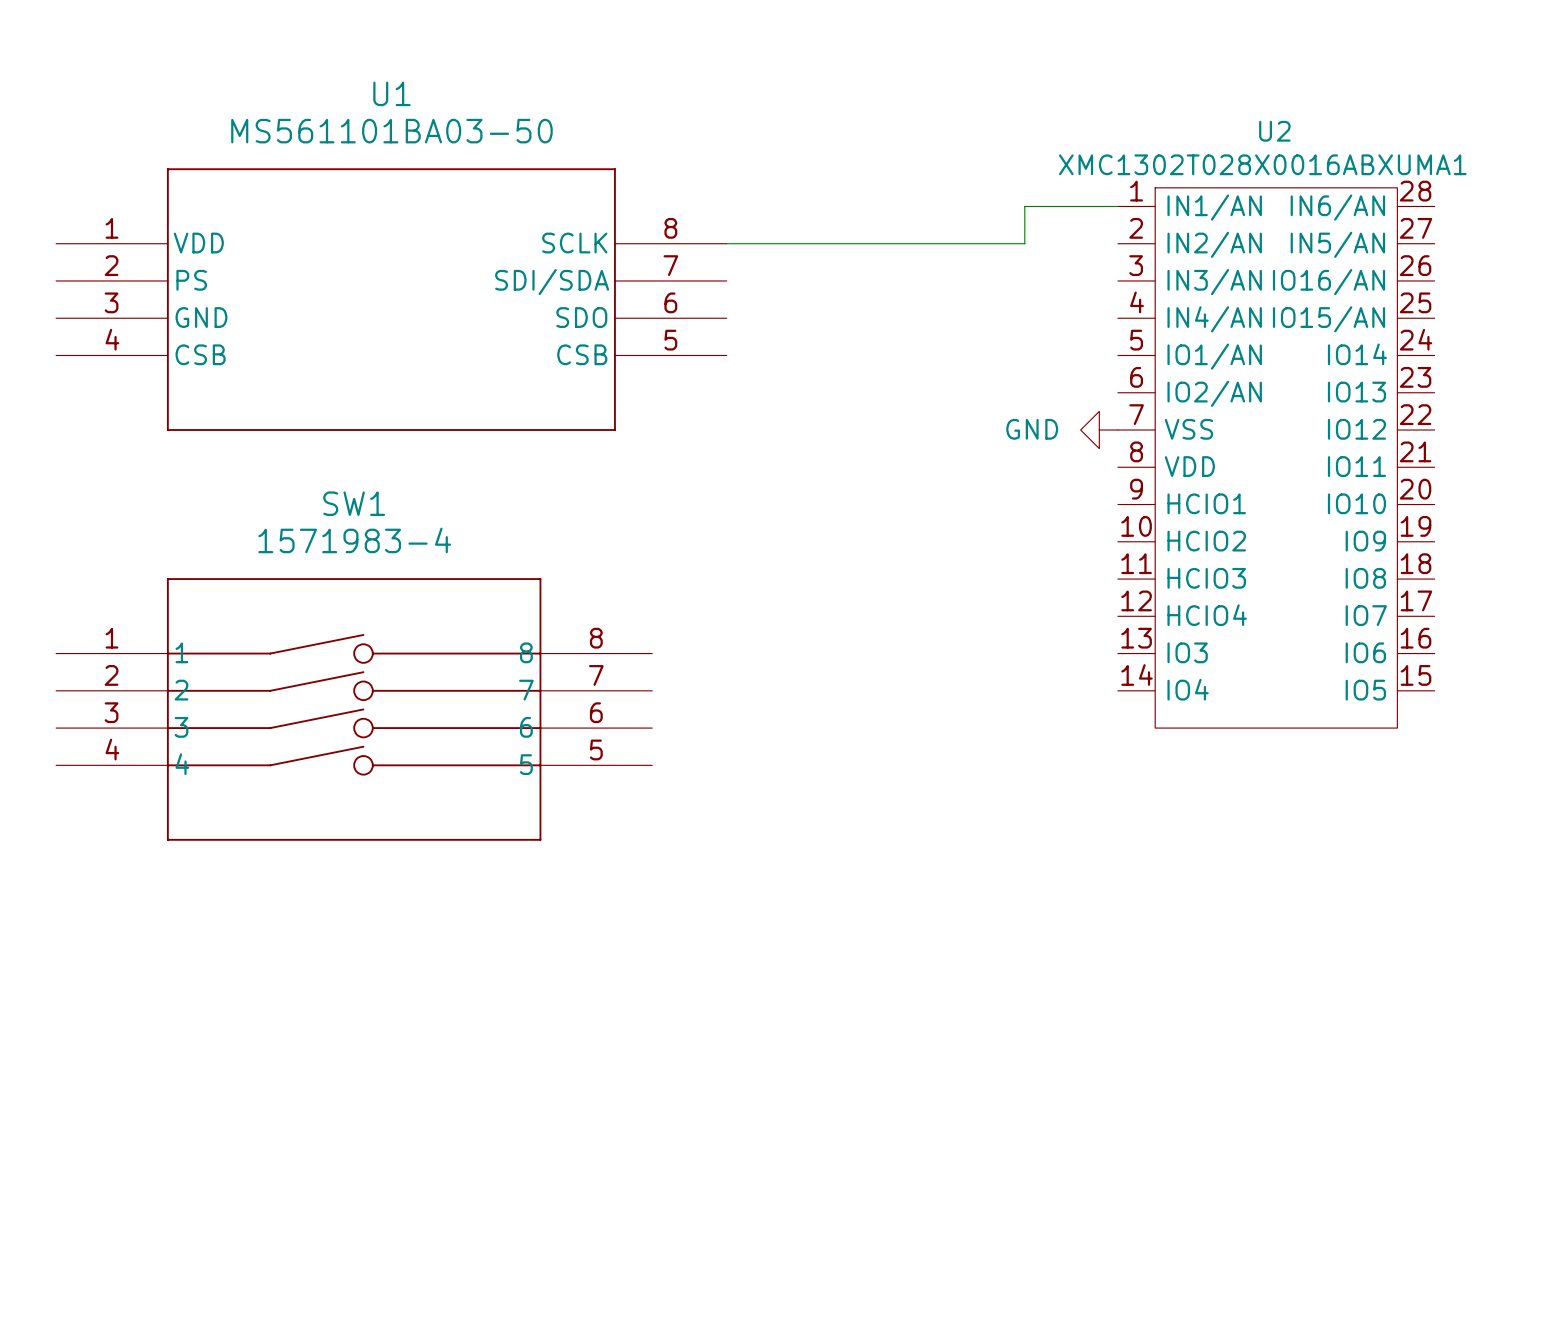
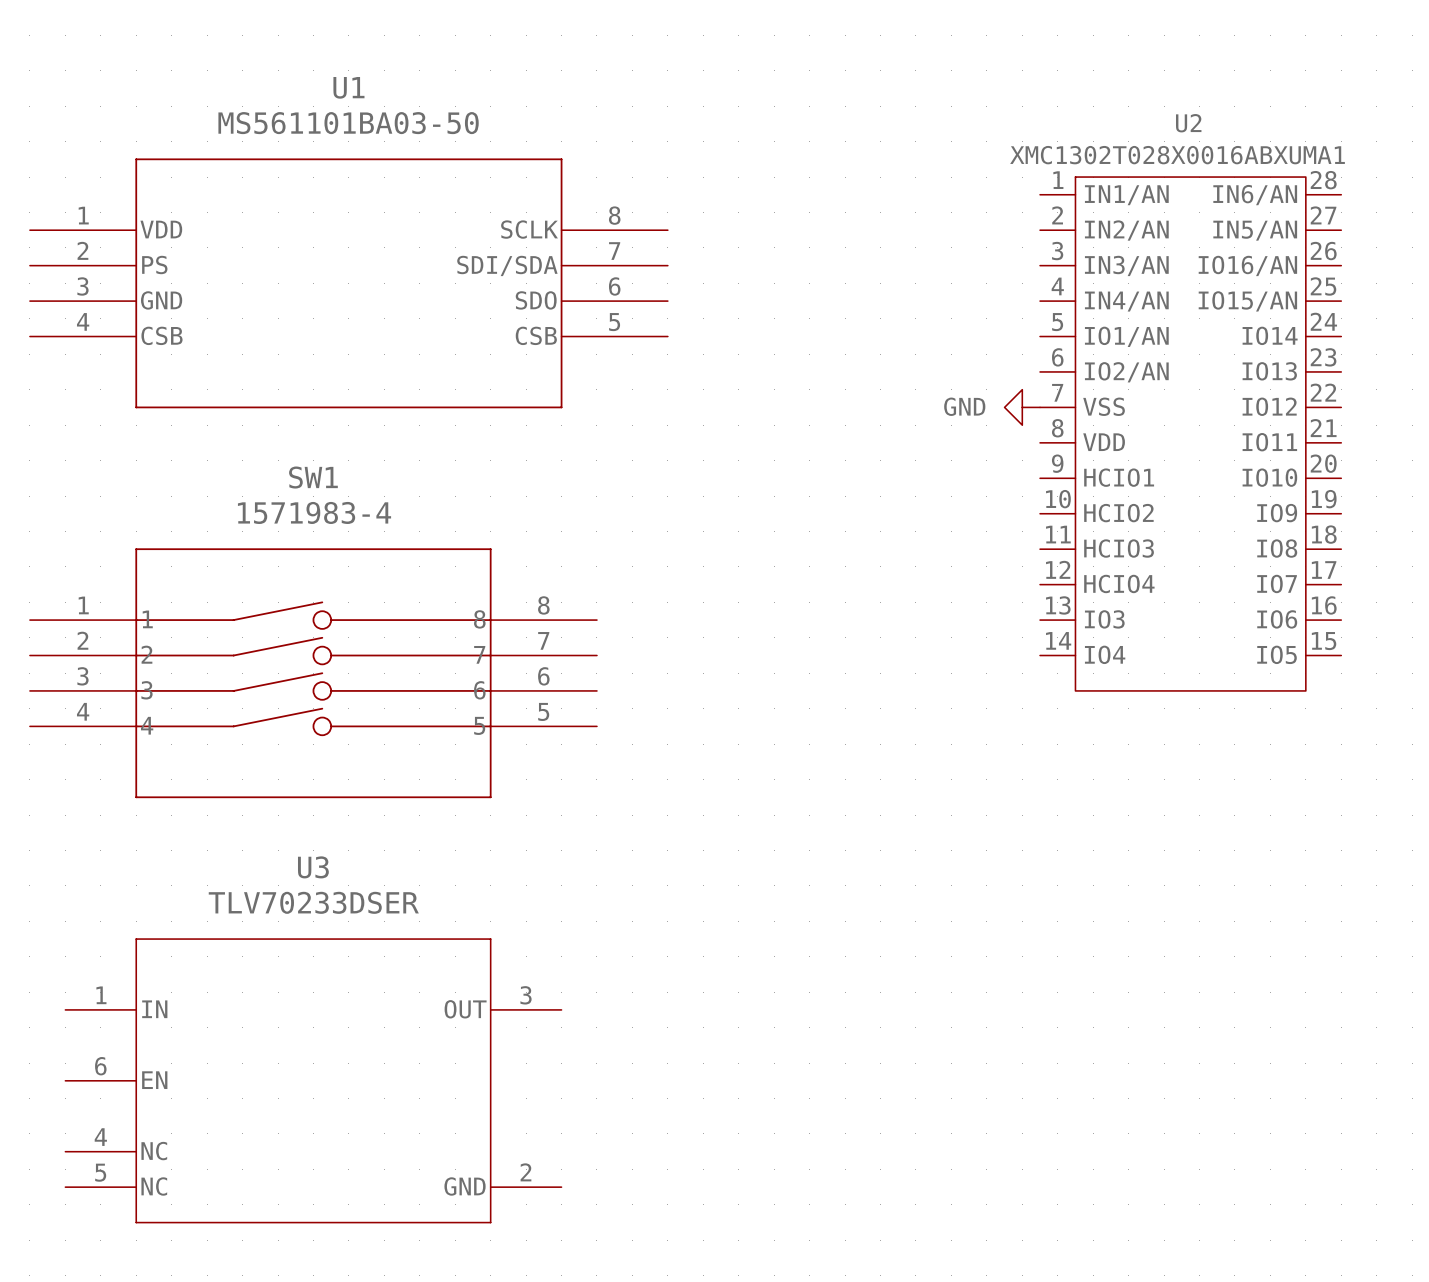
wire: (1117, 206) (1024, 206) (1024, 243) (726, 243) -> none
U3: none -> TLV70233DSER (313, 1080)

